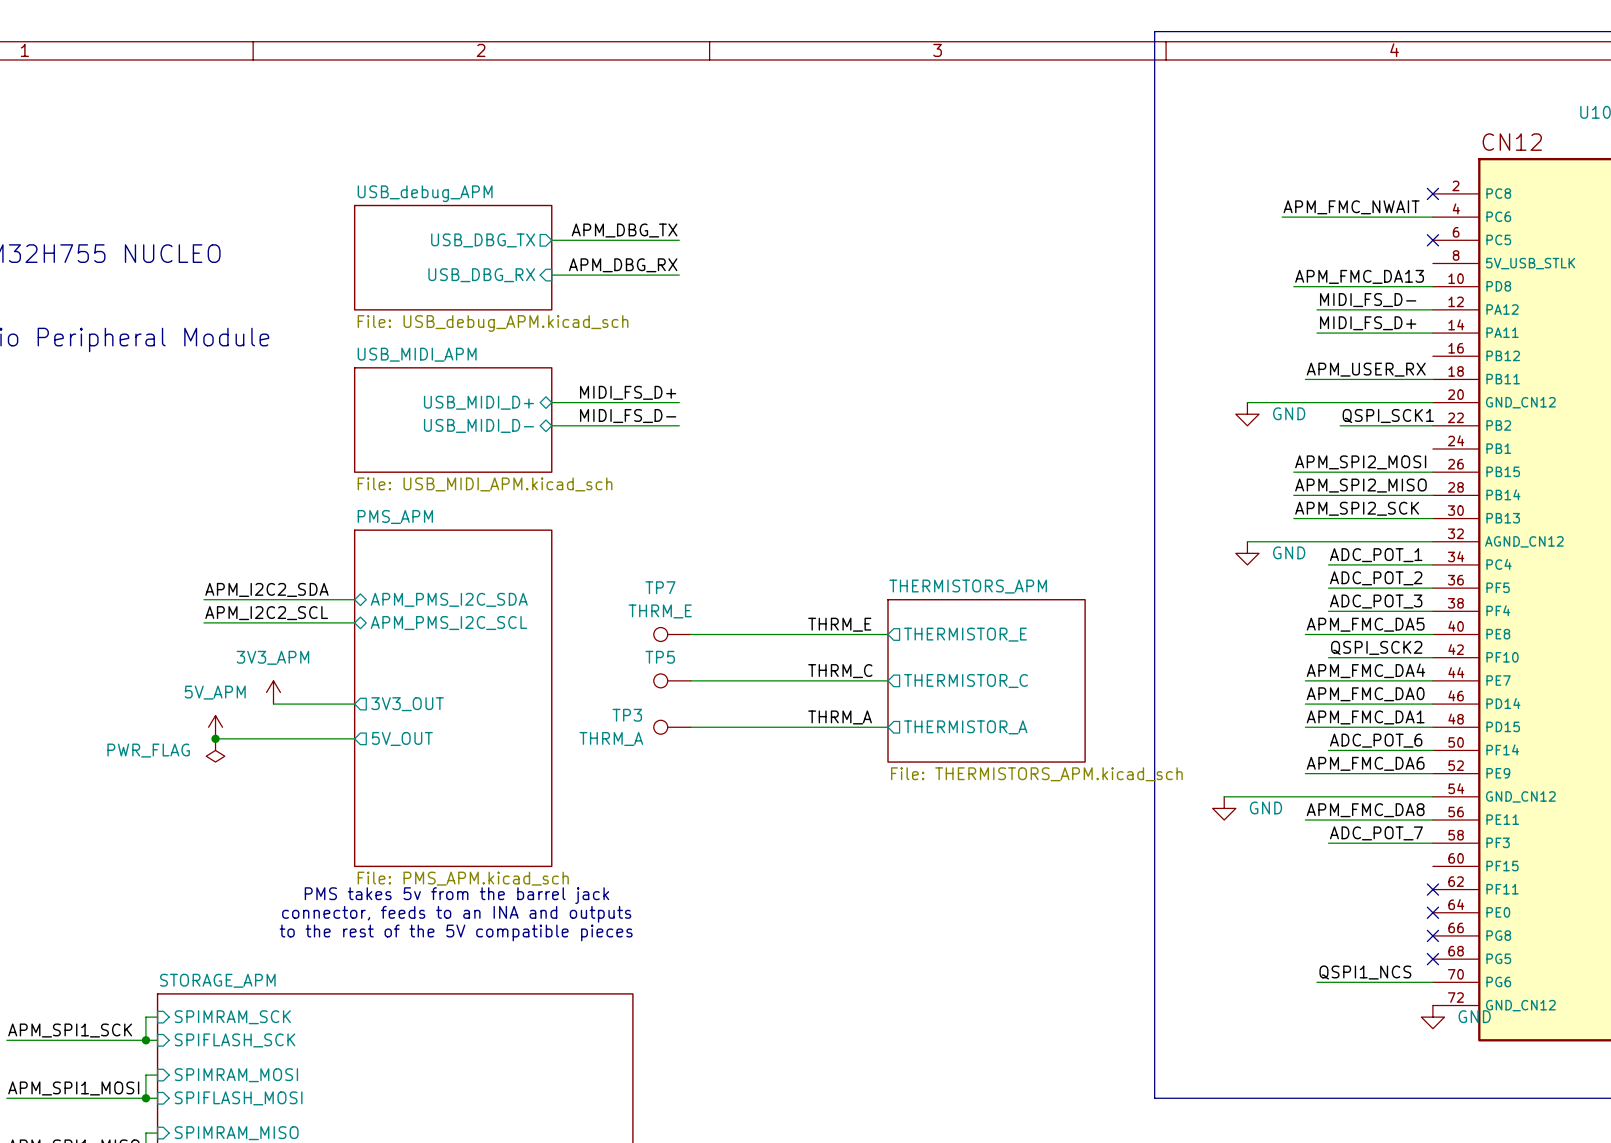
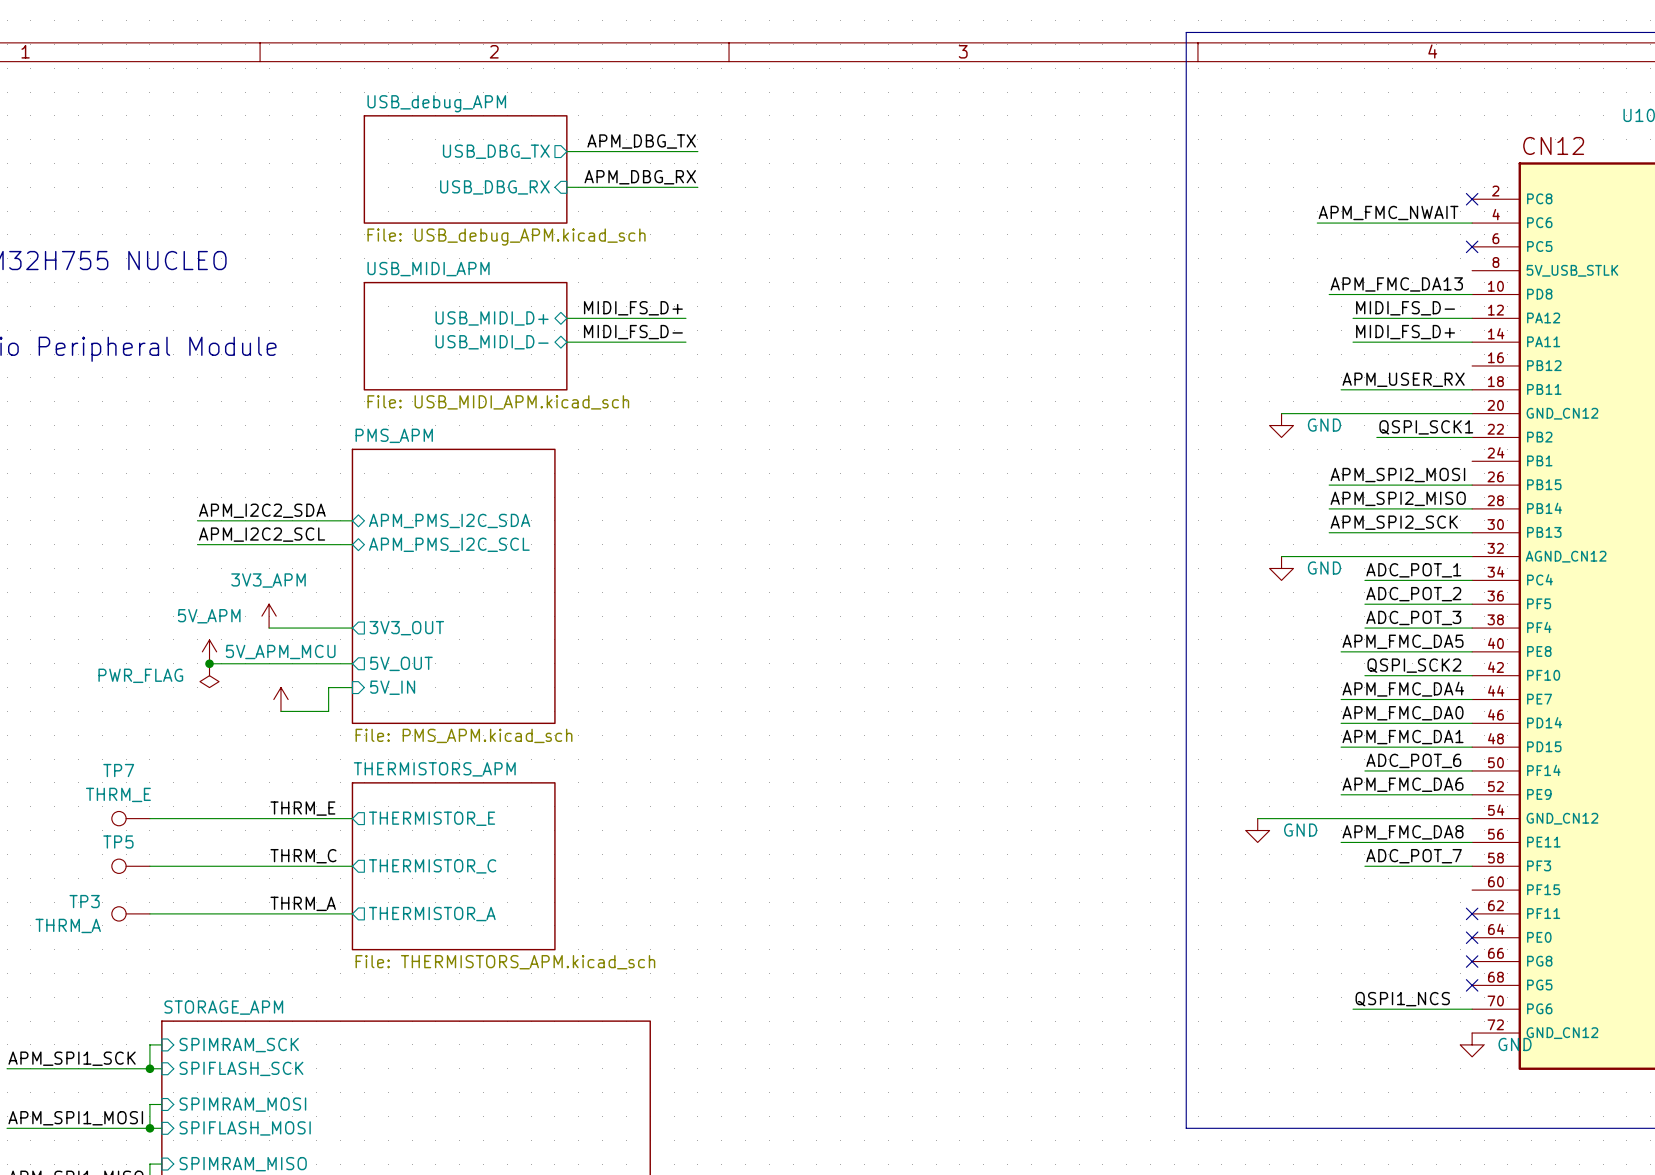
label position: APM_DBG_TX (624, 230) -> APM_DBG_TX (641, 141)
sheet pin position: USB_DBG_TX (483, 240) -> USB_DBG_TX (496, 151)
wire: (551, 240) (679, 240) -> (566, 151) (697, 151)
sheet USB_debug_APM position: (453, 257) -> (465, 169)
label position: APM_DBG_RX (623, 265) -> APM_DBG_RX (640, 177)
sheet pin position: USB_DBG_RX (481, 275) -> USB_DBG_RX (494, 187)
wire: (551, 275) (679, 275) -> (566, 187) (697, 187)
wire: none -> (566, 318) (685, 318)
wire: none -> (566, 342) (685, 342)
label position: MIDI_FS_D+ (628, 392) -> MIDI_FS_D+ (633, 308)
sheet pin position: USB_MIDI_D+ (478, 402) -> USB_MIDI_D+ (492, 318)
wire: (551, 402) (679, 402) -> none
label position: MIDI_FS_D- (628, 416) -> MIDI_FS_D- (633, 332)
sheet USB_MIDI_APM position: (453, 420) -> (465, 336)
sheet pin position: USB_MIDI_D- (478, 425) -> USB_MIDI_D- (492, 342)
wire: (551, 425) (679, 425) -> none
sheet PMS_APM: none -> File: PMS_APM.kicad_sch (453, 586)
label position: APM_I2C2_SDA (266, 589) -> APM_I2C2_SDA (262, 510)
wire: (203, 599) (354, 599) -> (197, 520) (352, 520)
sheet pin position: APM_PMS_I2C_SDA (449, 599) -> APM_PMS_I2C_SDA (449, 520)
label position: APM_I2C2_SCL (266, 613) -> APM_I2C2_SCL (262, 534)
wire: (203, 622) (354, 622) -> (197, 544) (352, 544)
sheet pin position: APM_PMS_I2C_SCL (448, 623) -> APM_PMS_I2C_SCL (449, 544)
label: THRM_E (839, 624) -> none
TP7 position: (672, 634) -> (130, 818)
wire: (690, 634) (887, 634) -> none
sheet pin: THERMISTOR_E (965, 634) -> none
junction: none -> (209, 663)
wire: none -> (352, 687) (328, 687) (328, 711) (280, 711)
sheet pin: none -> 5V_IN (392, 687)
label: THRM_C (840, 671) -> none
power symbol: none -> 5V_APM_MCU (280, 699)
TP5 position: (672, 680) -> (130, 866)
wire: (690, 680) (887, 680) -> none
sheet THERMISTORS_APM: File: THERMISTORS_APM.kicad_sch (986, 680) -> none
sheet pin: THERMISTOR_C (966, 681) -> none
power symbol position: 3V3_APM (273, 692) -> 3V3_APM (269, 616)
sheet PMS_APM: File: PMS_APM.kicad_sch (453, 698) -> none
wire: (273, 704) (354, 704) -> (269, 628) (352, 628)
sheet pin position: 3V3_OUT (407, 704) -> 3V3_OUT (406, 628)
label: THRM_A (840, 717) -> none
power symbol position: 5V_APM (215, 727) -> 5V_APM (209, 651)
TP3 position: (672, 727) -> (130, 913)
wire: (690, 727) (887, 727) -> none
sheet pin: THERMISTOR_A (965, 727) -> none
wire: (215, 738) (354, 738) -> (209, 663) (352, 663)
junction: (215, 738) -> none
sheet pin position: 5V_OUT (402, 738) -> 5V_OUT (401, 663)
power symbol position: PWR_FLAG (215, 750) -> PWR_FLAG (209, 675)
label: none -> THRM_E (302, 808)
wire: none -> (149, 818) (352, 818)
sheet pin: none -> THERMISTOR_E (432, 818)
label: none -> THRM_C (303, 856)
wire: none -> (149, 866) (352, 866)
sheet pin: none -> THERMISTOR_C (432, 866)
sheet THERMISTORS_APM: none -> File: THERMISTORS_APM.kicad_sch (453, 866)
label: none -> THRM_A (303, 903)
wire: none -> (149, 913) (352, 913)
sheet pin: none -> THERMISTOR_A (432, 914)
text: PMS takes 5v from the barrel jack (456, 895) -> none
text: connector, feeds to an INA and outputs (456, 914) -> none
text: to the rest of the 5V compatible pieces (456, 932) -> none

